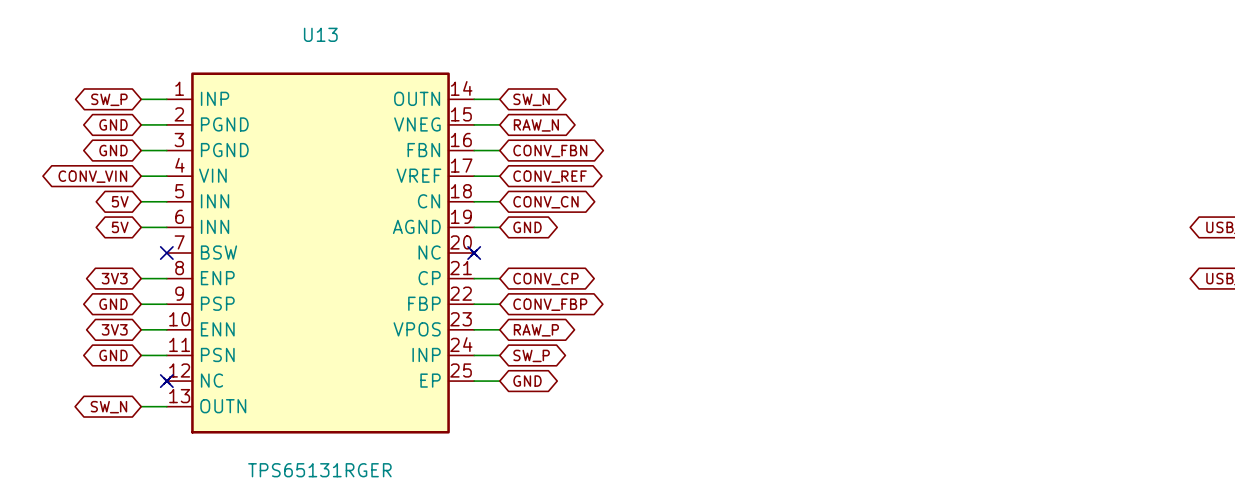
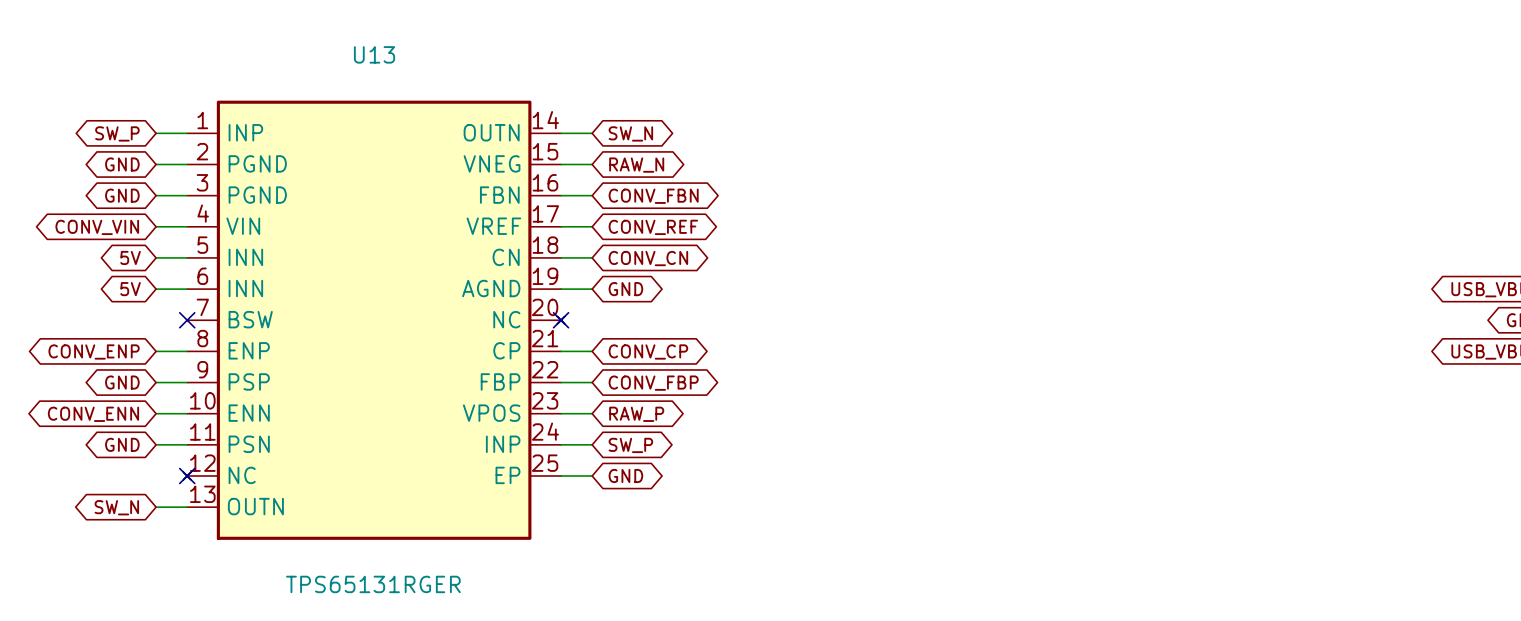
global label: 3V3 (114, 278) -> CONV_ENP (94, 351)
global label: 3V3 (114, 329) -> CONV_ENN (93, 414)

